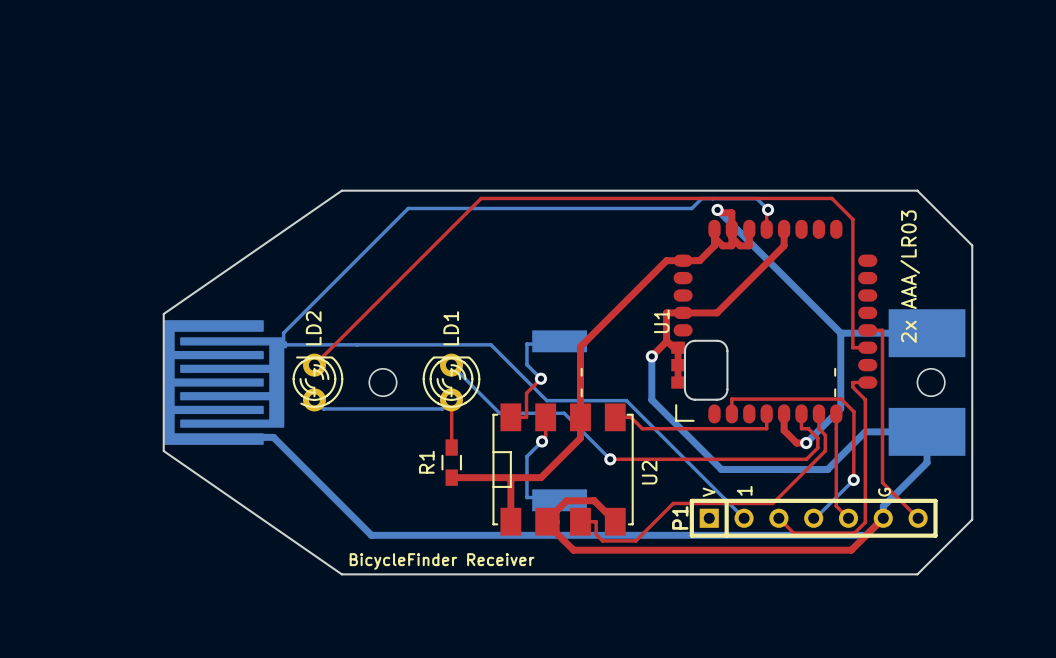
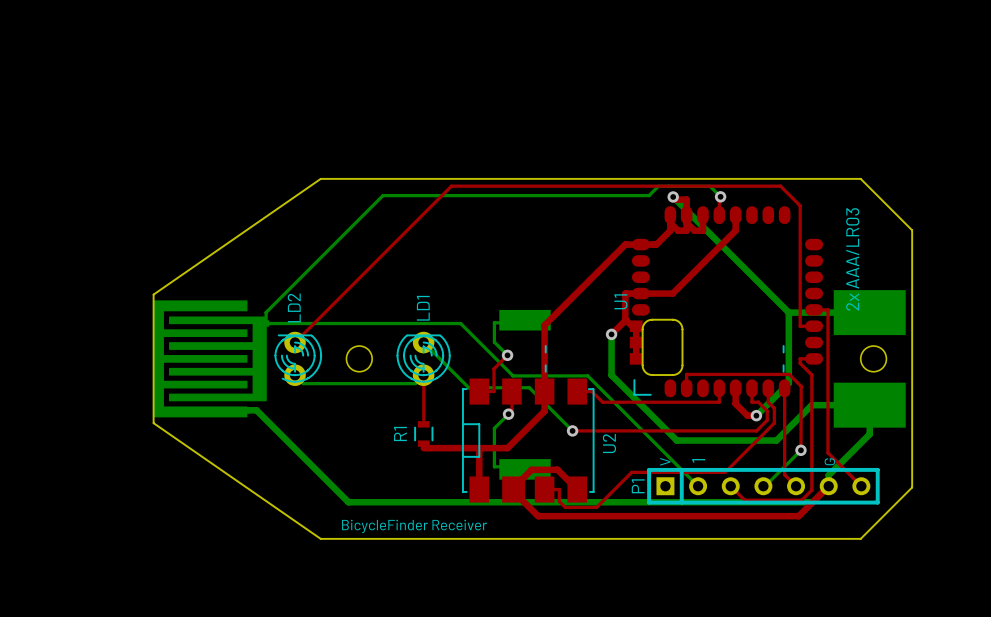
R1 footprint: [441, 439, 462, 486] -> [414, 421, 434, 447]

